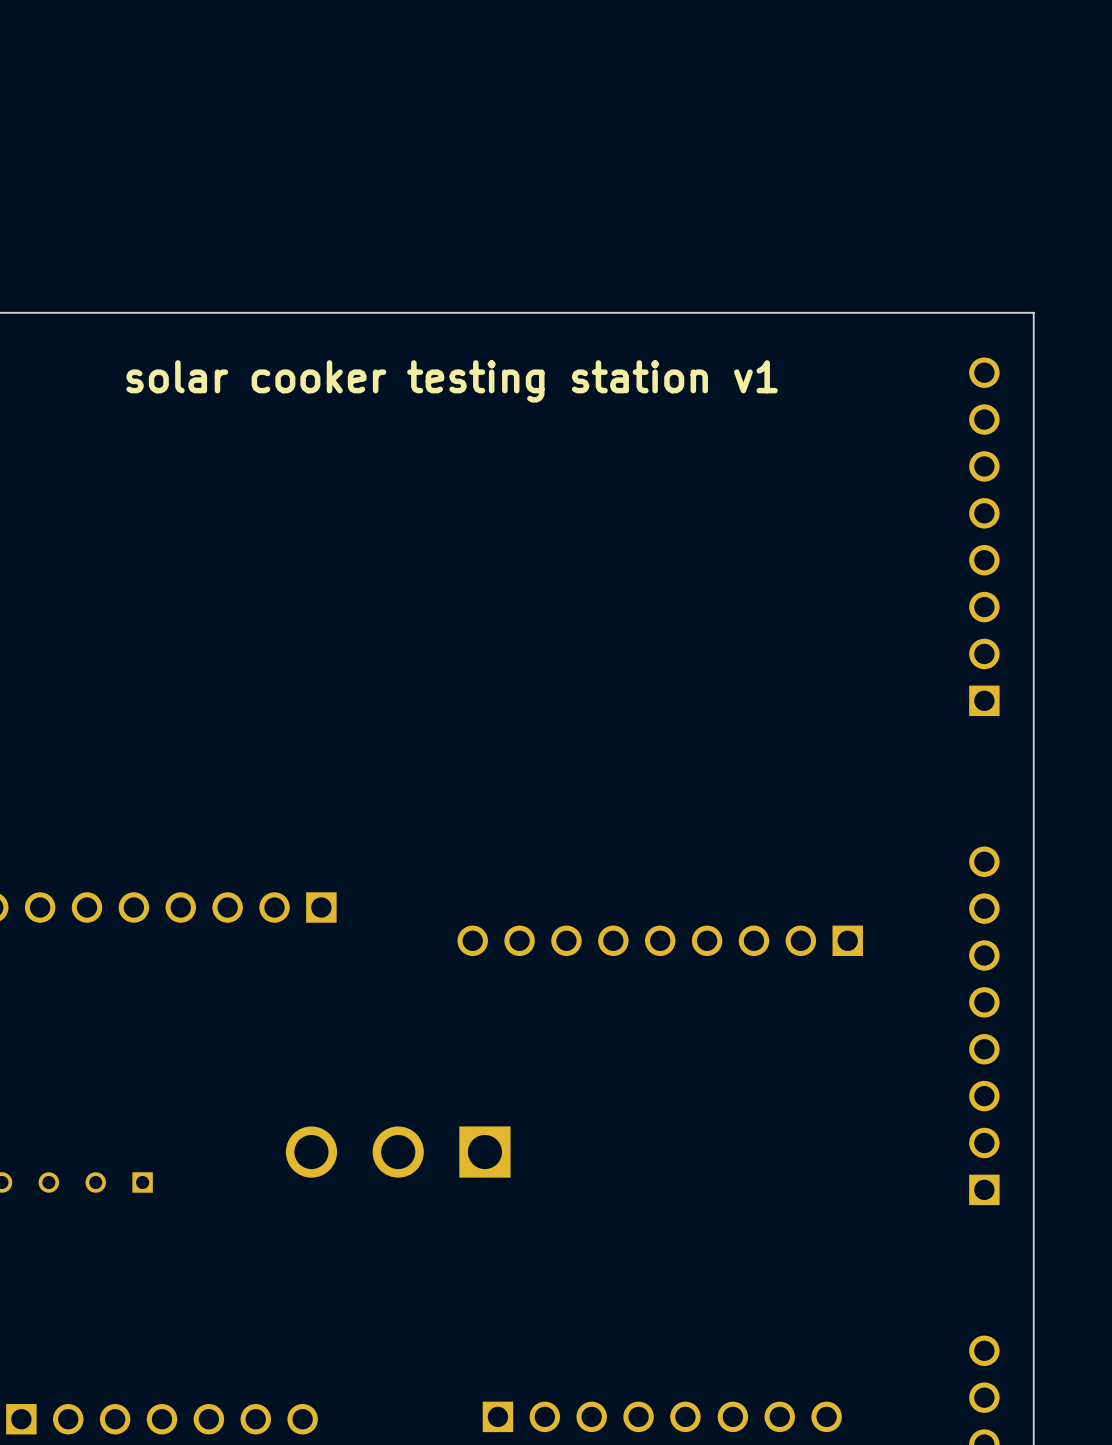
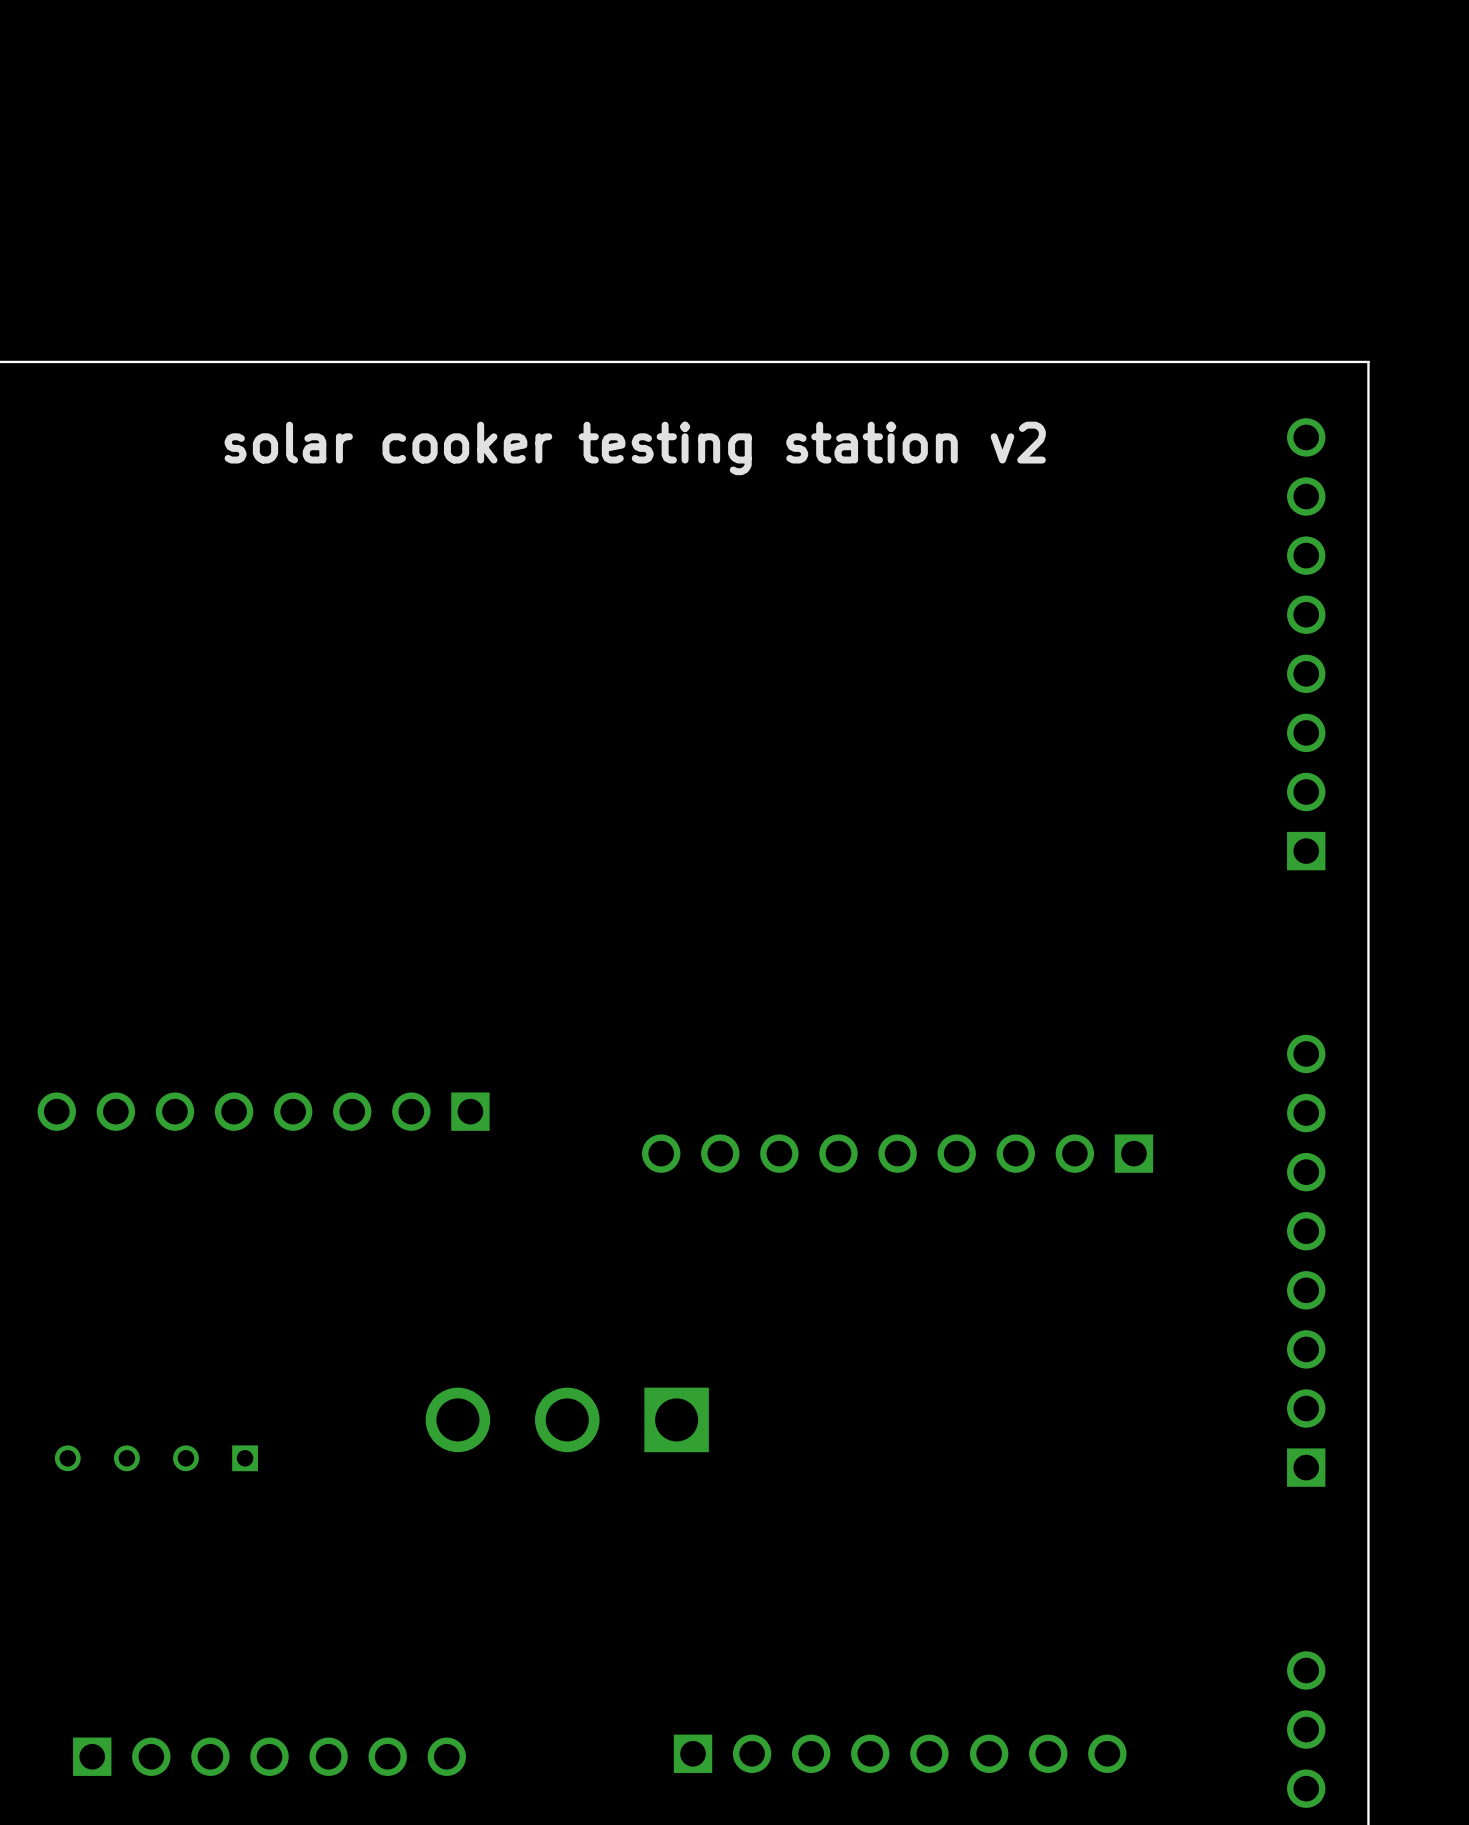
text: solar cooker testing station v1 (452, 381) -> solar cooker testing station v2 (635, 448)

